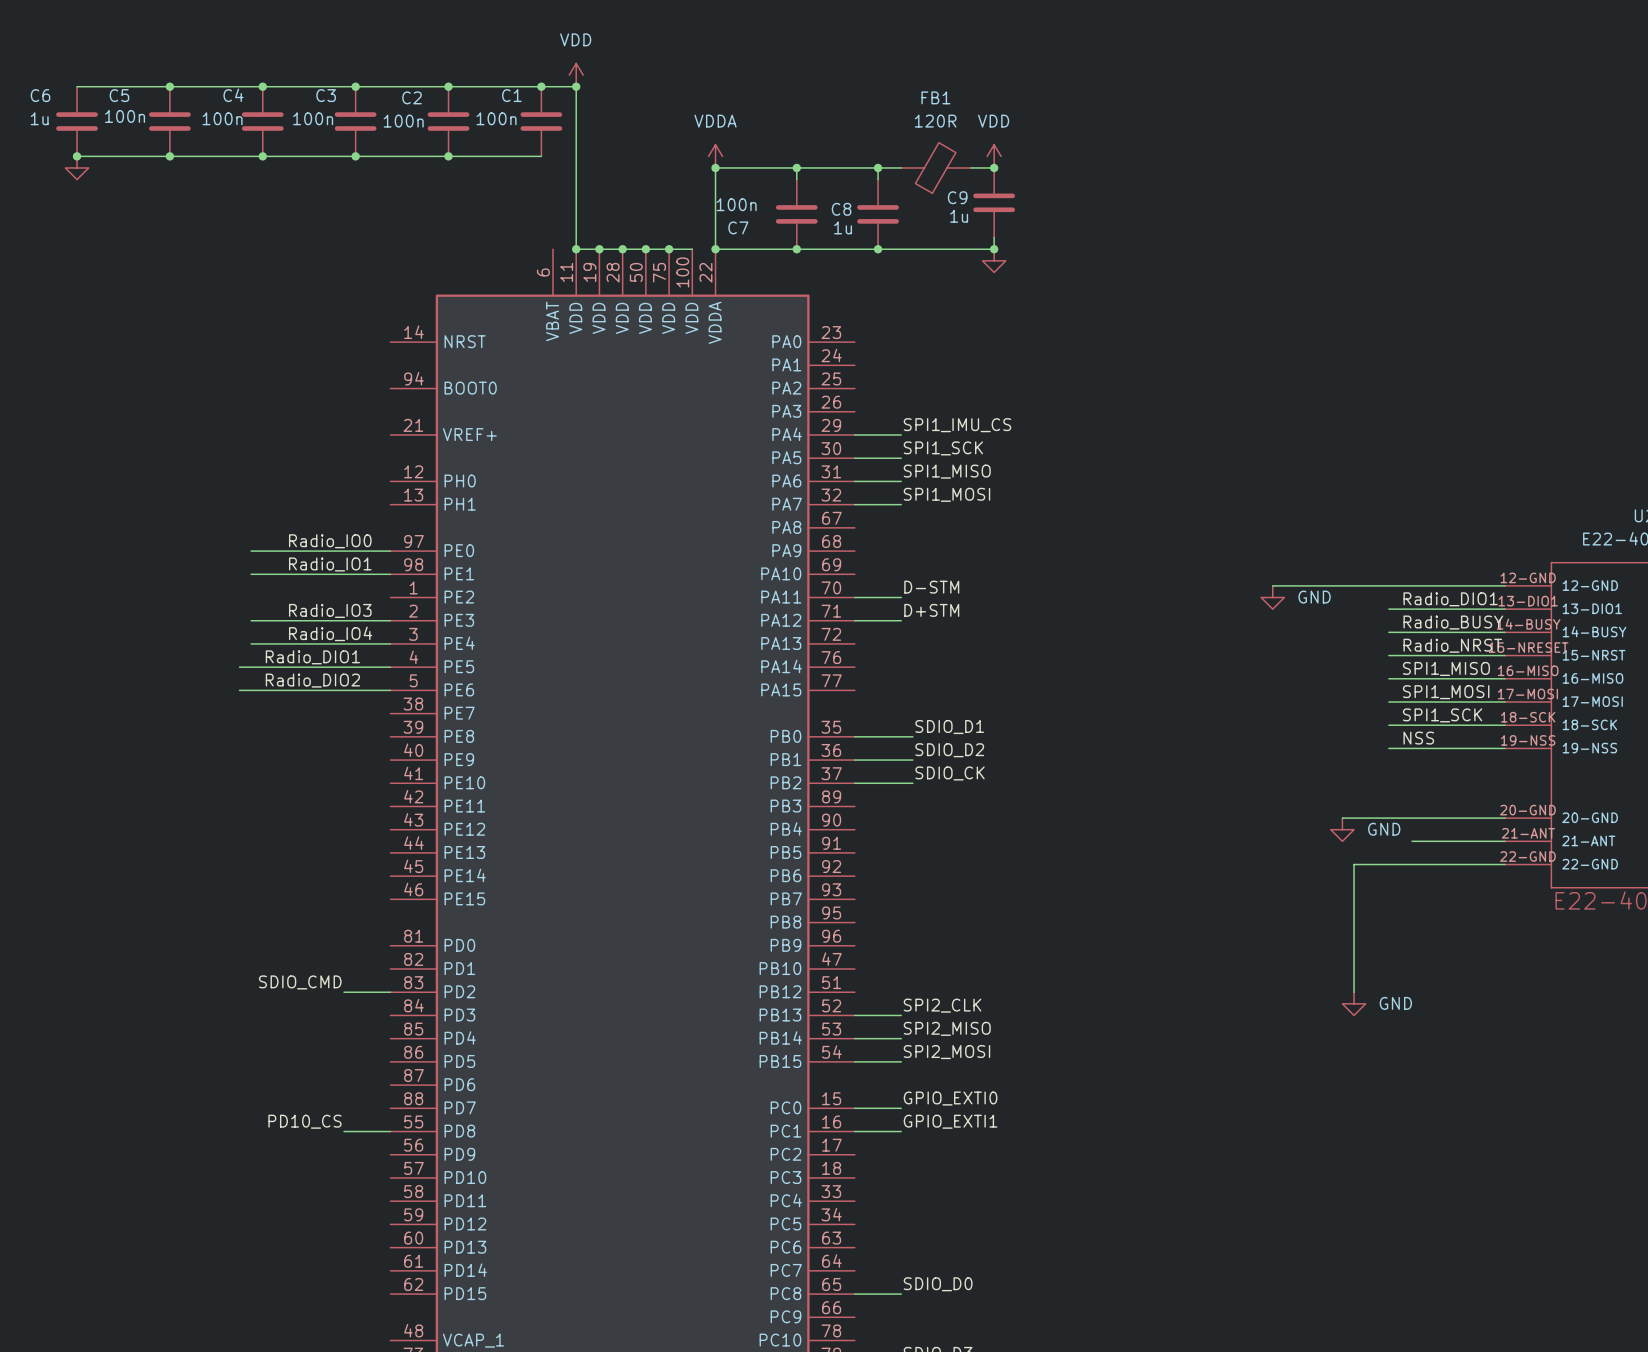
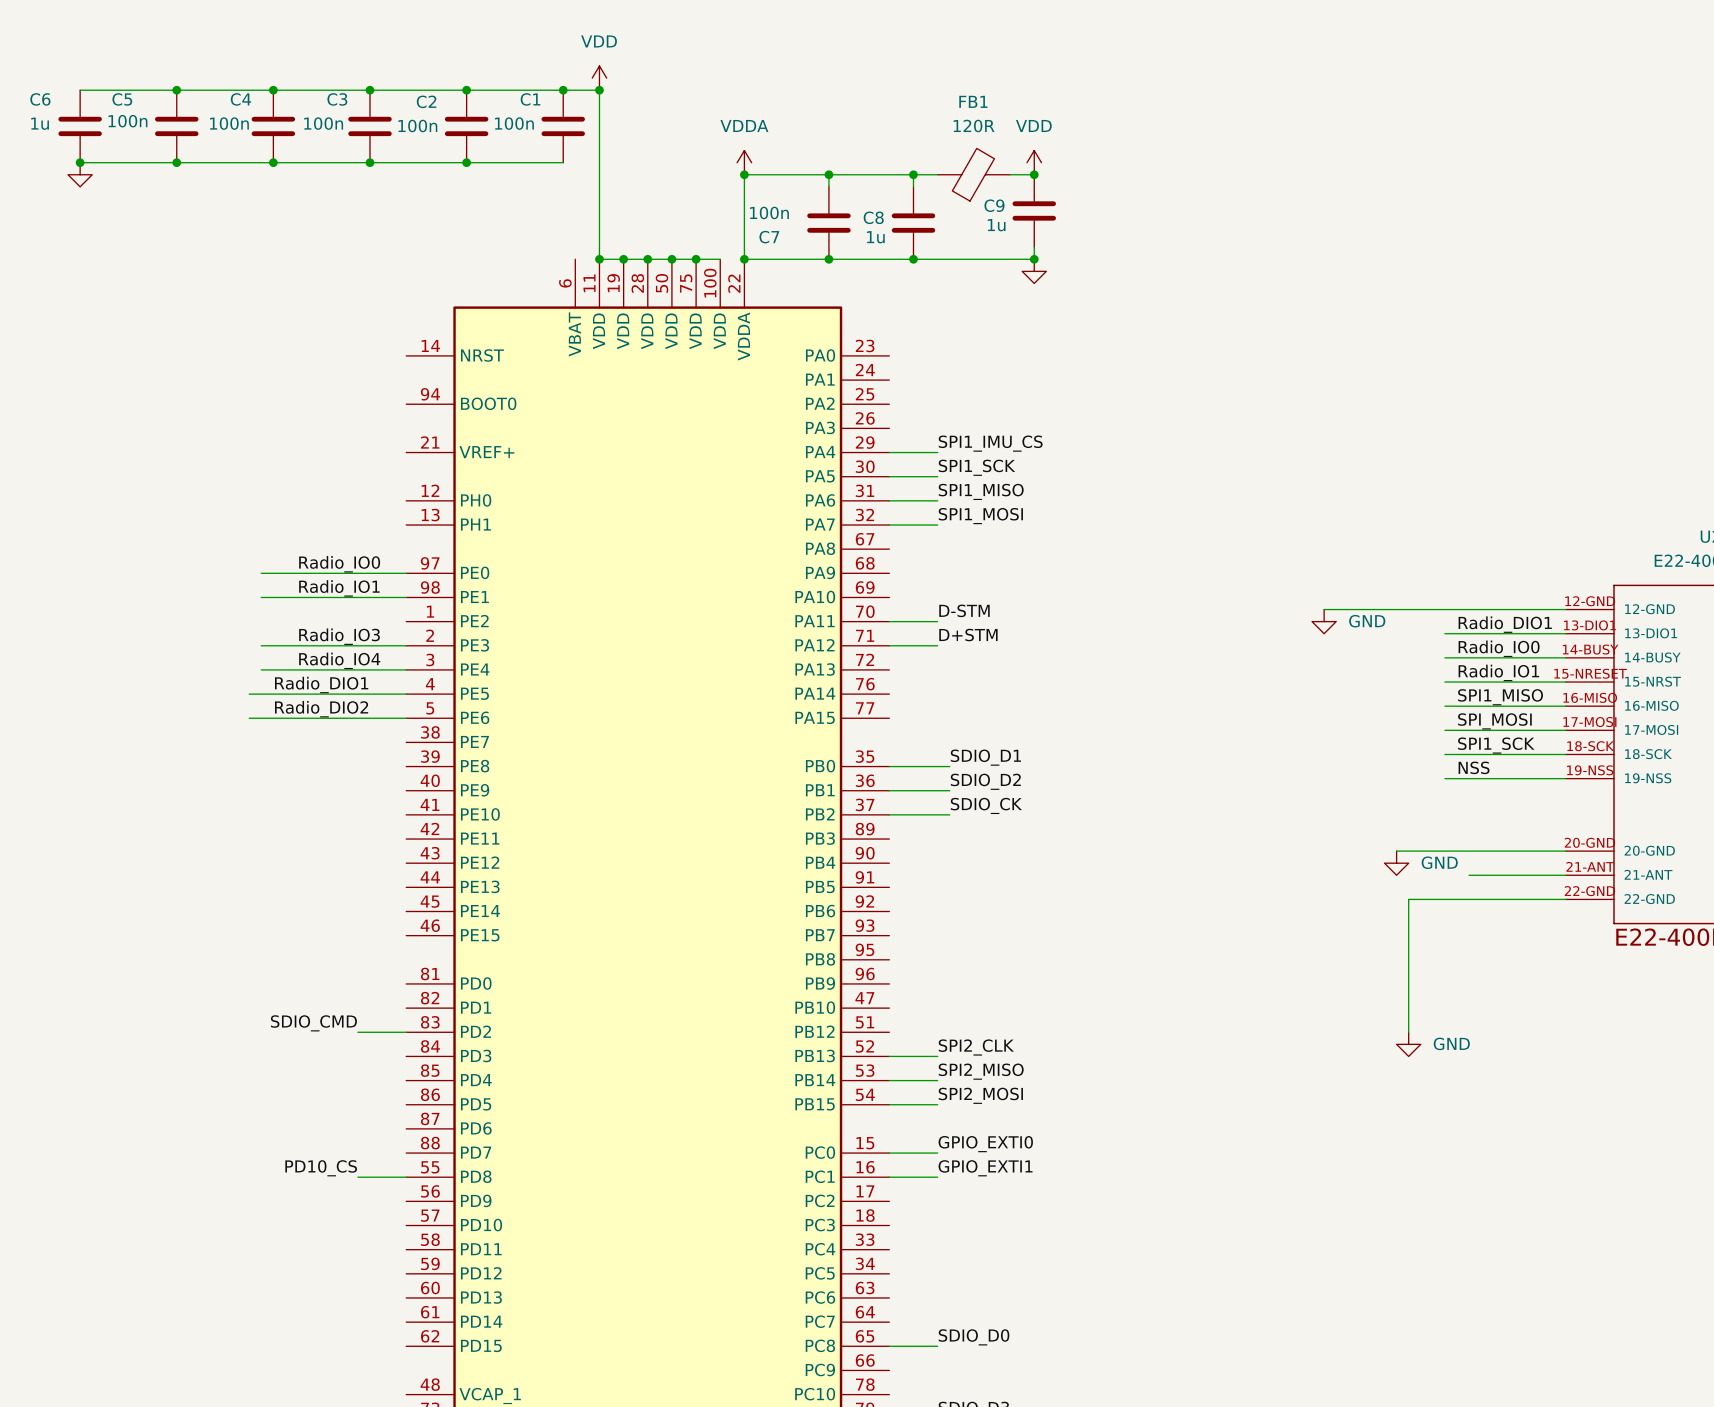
label: Radio_BUSY (1453, 622) -> Radio_IO0 (1499, 648)
label: Radio_NRST (1452, 645) -> Radio_IO1 (1498, 672)
label: SPI1_MOSI (1446, 692) -> SPI_MOSI (1494, 721)

